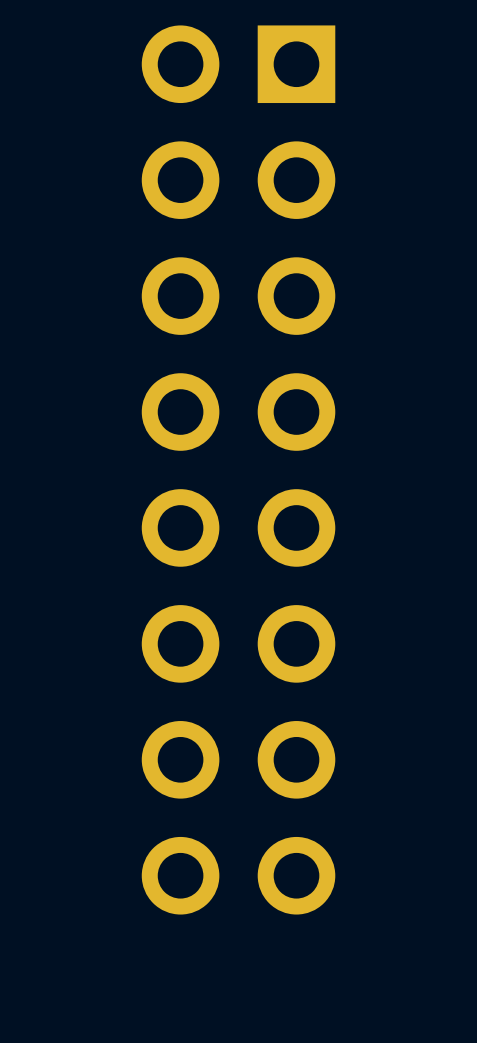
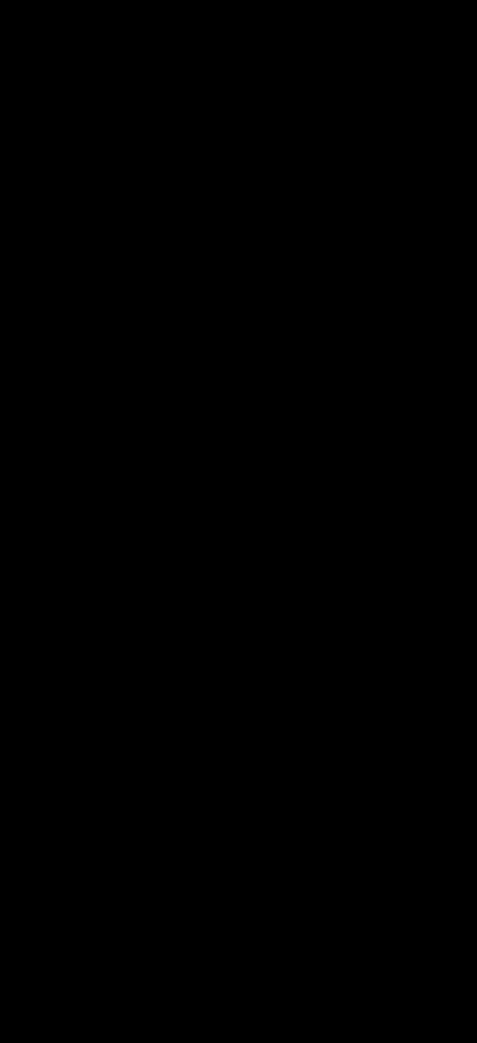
part: (238, 469) -> none

